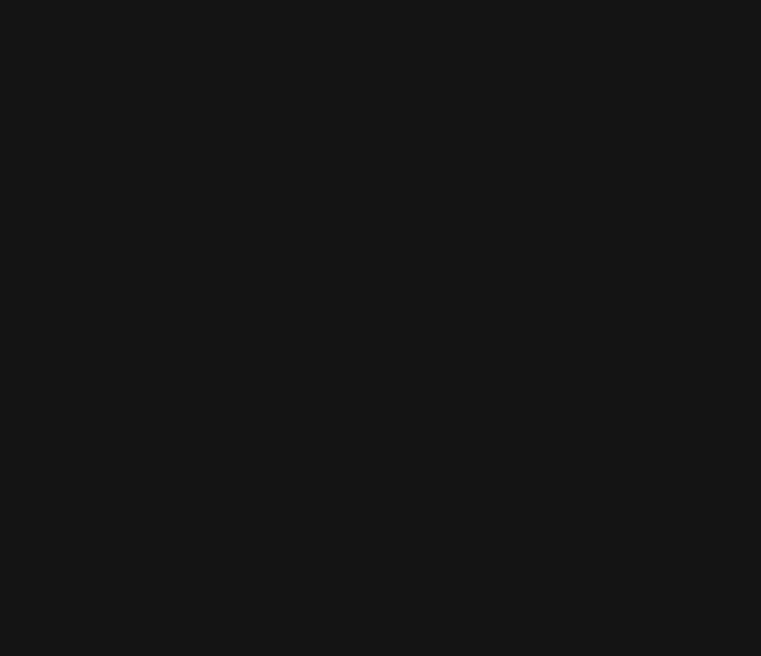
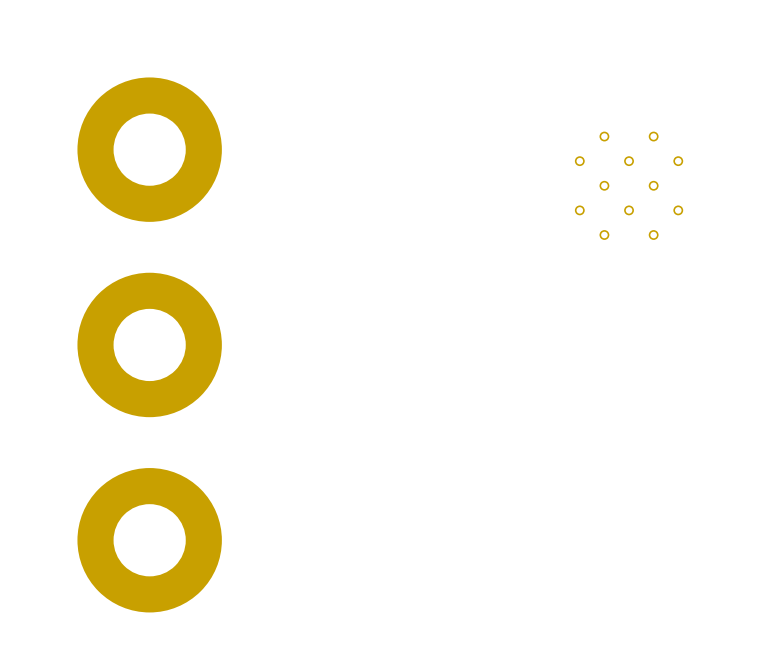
part: none -> (149, 149)
part: none -> (629, 185)
part: none -> (149, 344)
part: none -> (149, 540)

